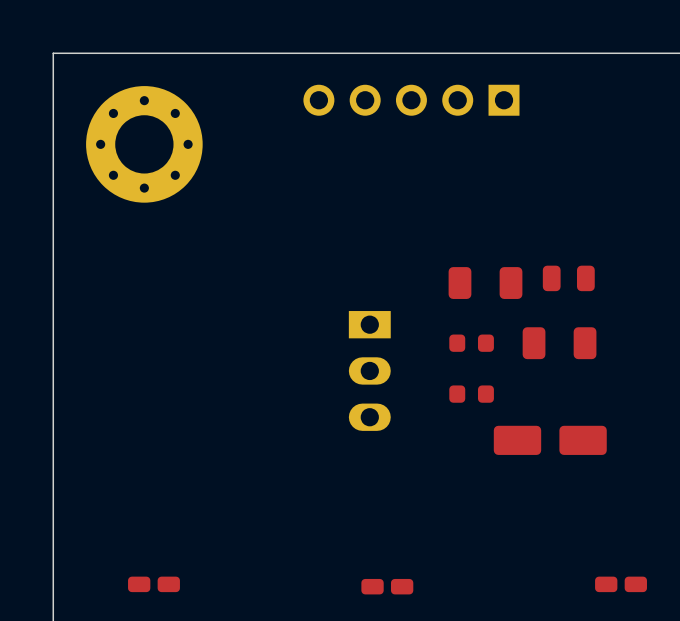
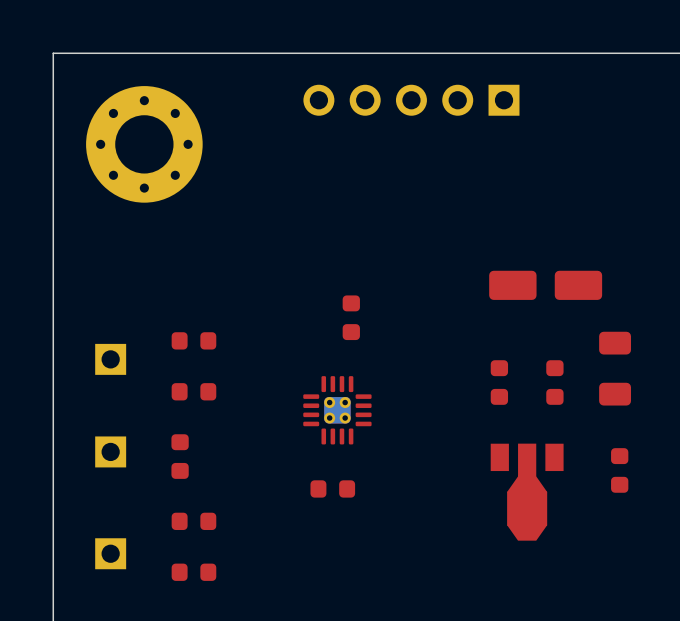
part: (568, 278) -> none
part: (485, 283) -> none
part: none -> (351, 317)
part: none -> (193, 340)
part: (471, 343) -> none
part rotation: 0° (559, 343) -> 90° clockwise (615, 368)
part position: (559, 343) -> (615, 368)
part: none -> (110, 359)
part: (369, 370) -> none
part: none -> (499, 382)
part: none -> (554, 382)
part: none -> (193, 391)
part: (471, 394) -> none
part: none -> (337, 410)
part position: (550, 440) -> (545, 285)
part: none -> (110, 451)
part: none -> (180, 456)
part: none -> (619, 470)
part: none -> (332, 488)
part: none -> (527, 492)
part: none -> (193, 521)
part: none -> (110, 553)
part: none -> (193, 572)
part: (153, 584) -> none
part: (621, 584) -> none
part: (387, 586) -> none

